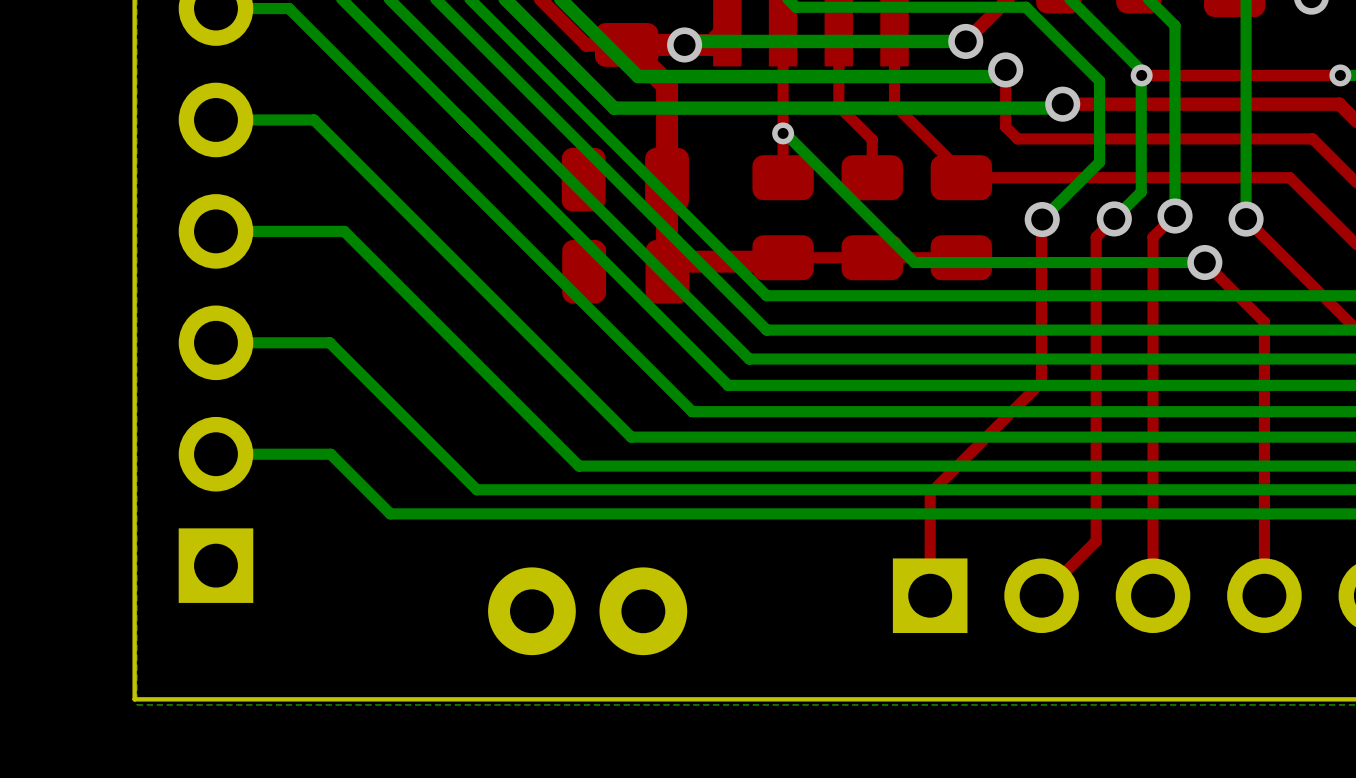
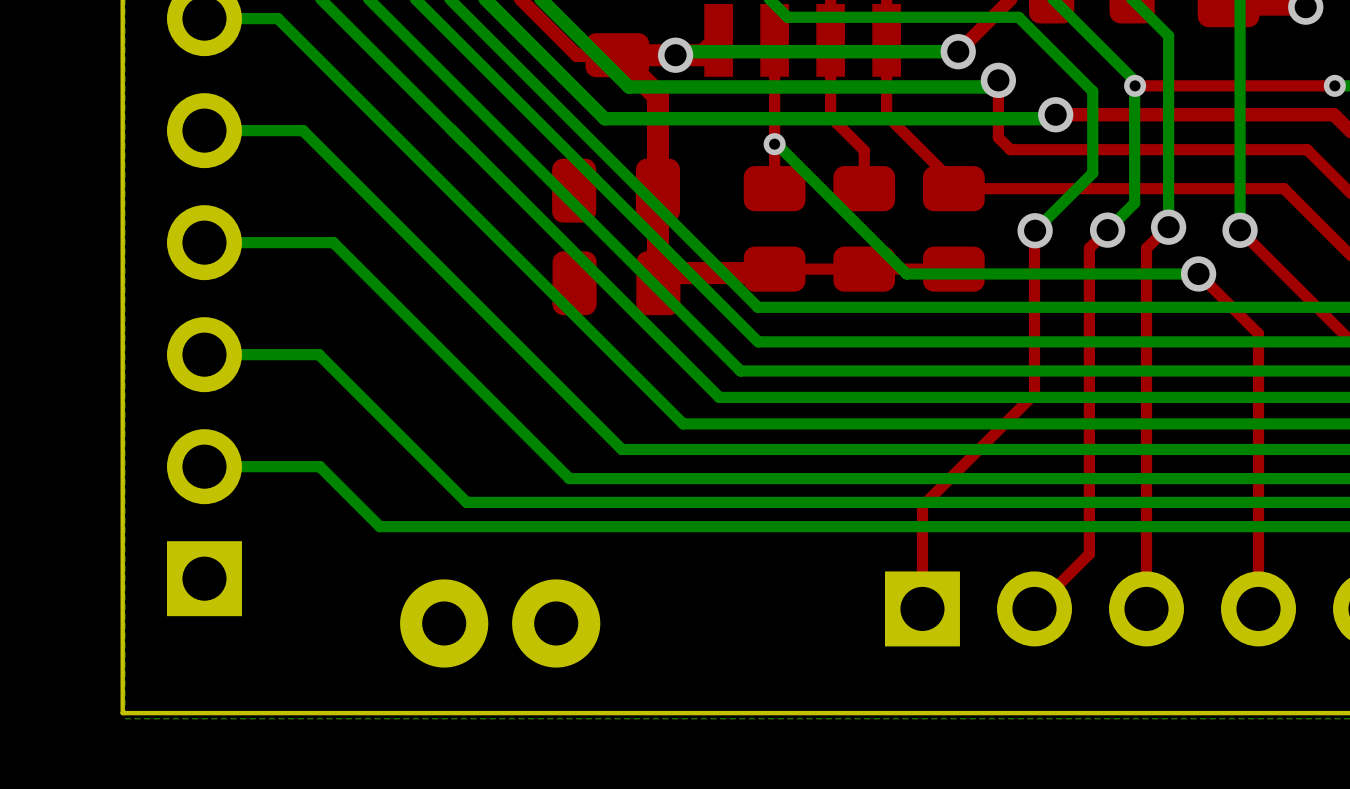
part position: (587, 611) -> (500, 623)

